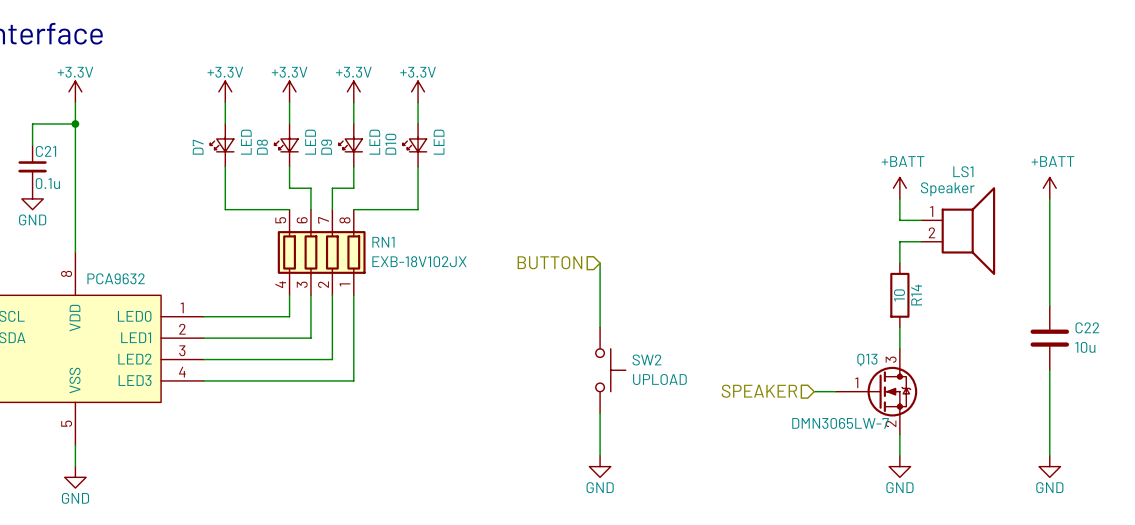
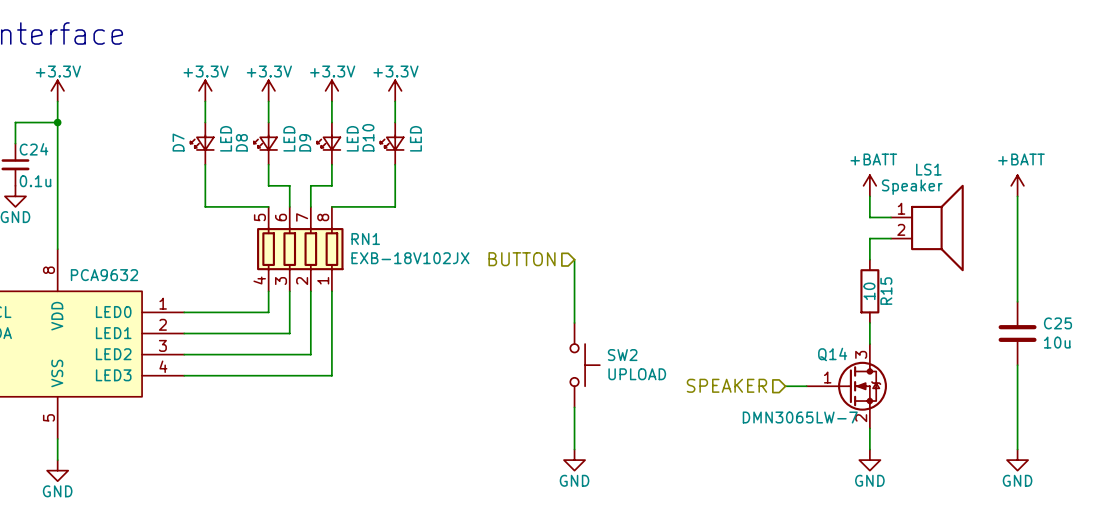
C21 name: C21 (45, 151) -> C24 (33, 149)
R14 name: R14 (916, 295) -> R15 (886, 291)
C22 name: C22 (1087, 327) -> C25 (1057, 323)
Q13 name: Q13 (867, 359) -> Q14 (832, 354)

